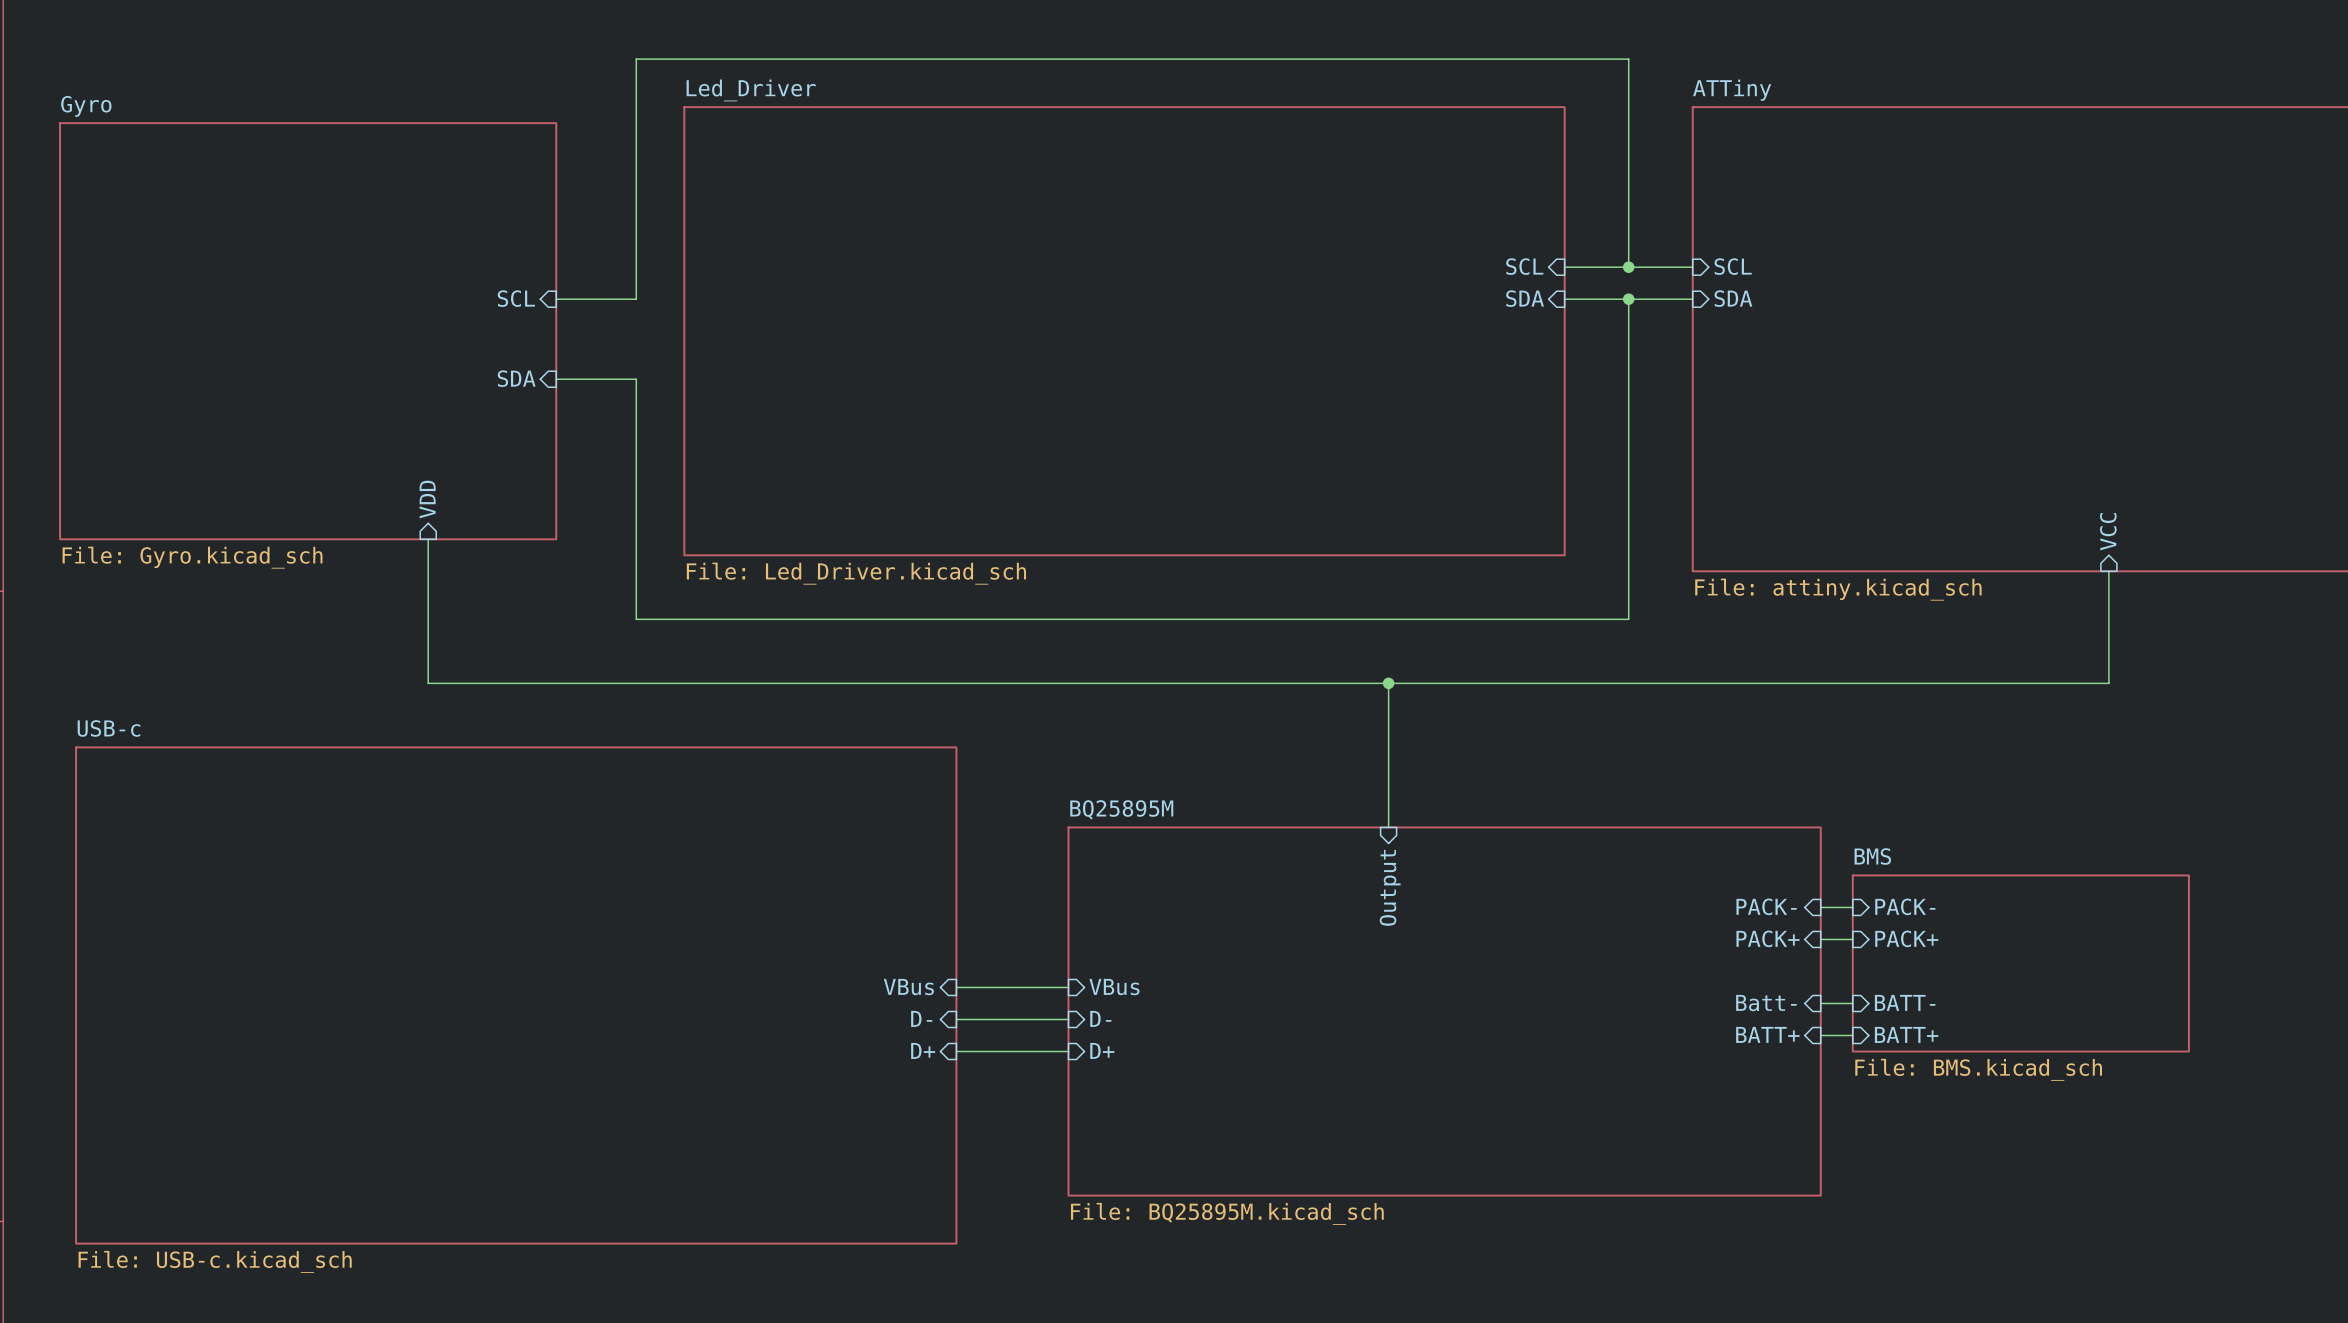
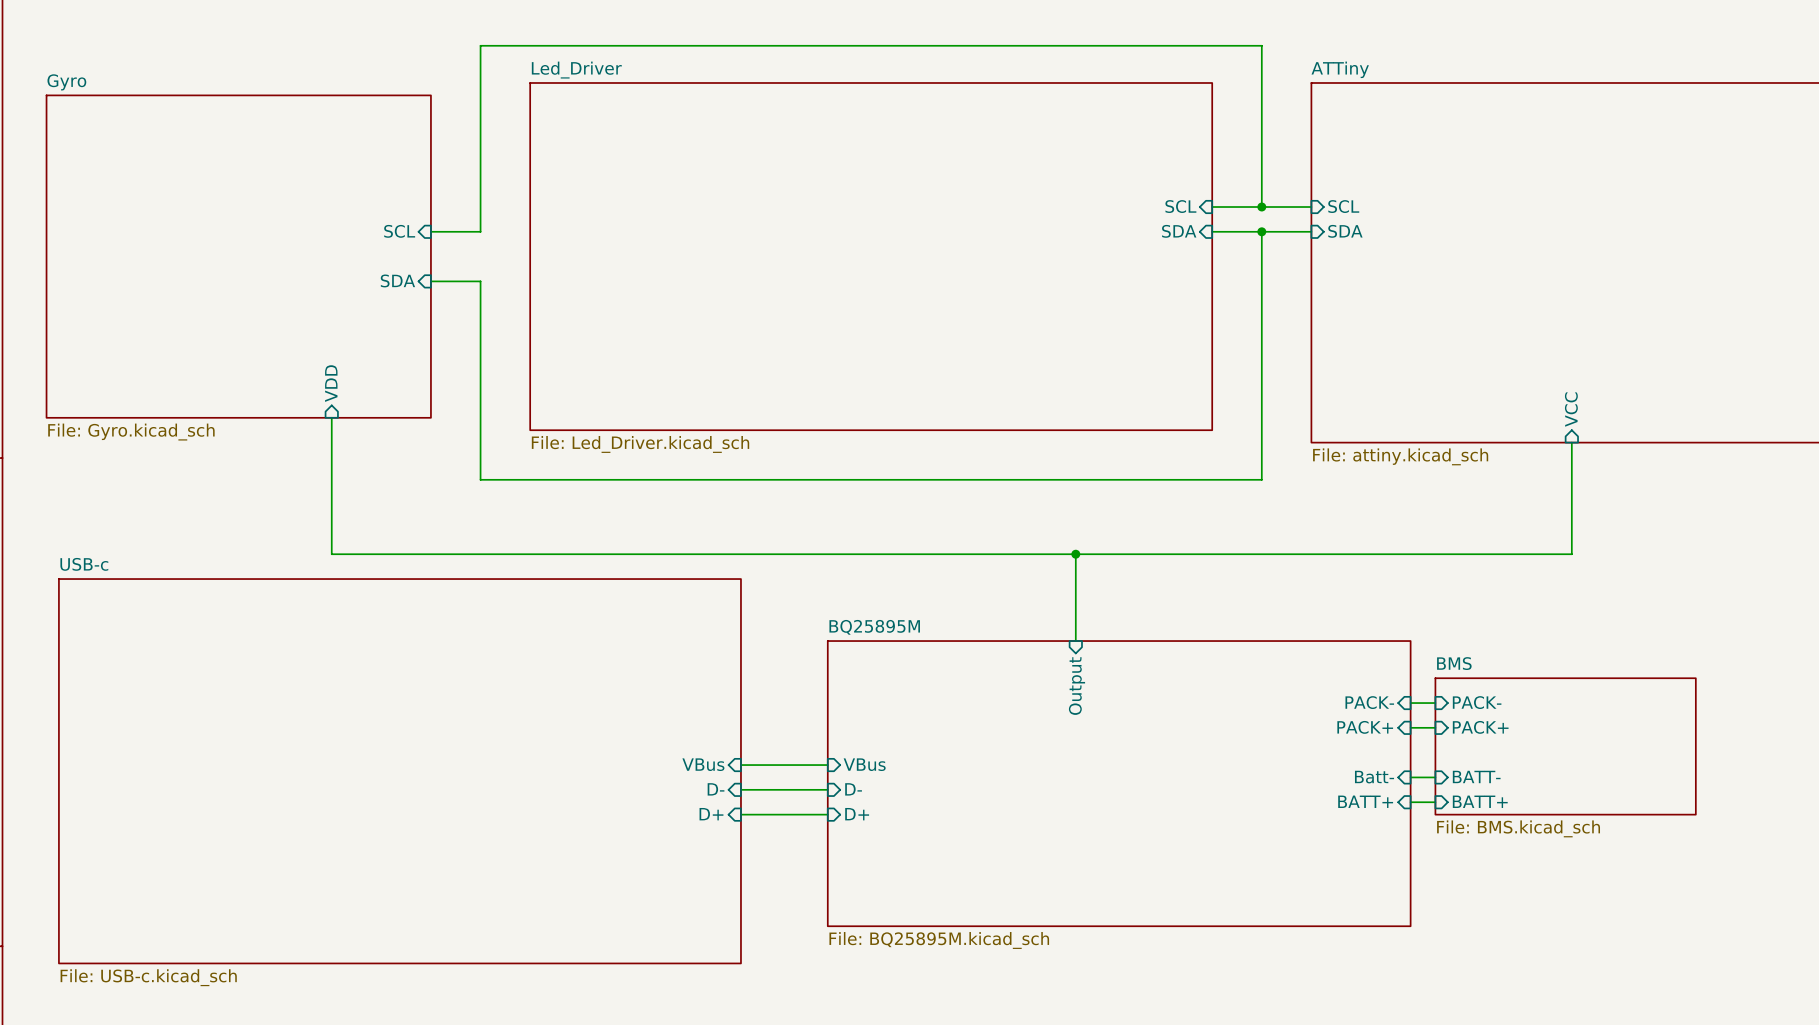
wire: (636, 59) (636, 299) (620, 299) -> (492, 45) (480, 45) (480, 231)
sheet pin position: SDA (516, 378) -> SDA (397, 280)
wire: (556, 379) (636, 379) (636, 619) -> (430, 281) (480, 281) (480, 479) (492, 479)
sheet pin position: VCC (2108, 531) -> VCC (1571, 409)
wire: (2108, 571) (2108, 683) (428, 683) -> (1571, 442) (1571, 554) (331, 554) (331, 529)
wire: (1388, 683) (1388, 715) -> none
junction position: (1388, 683) -> (1075, 554)

